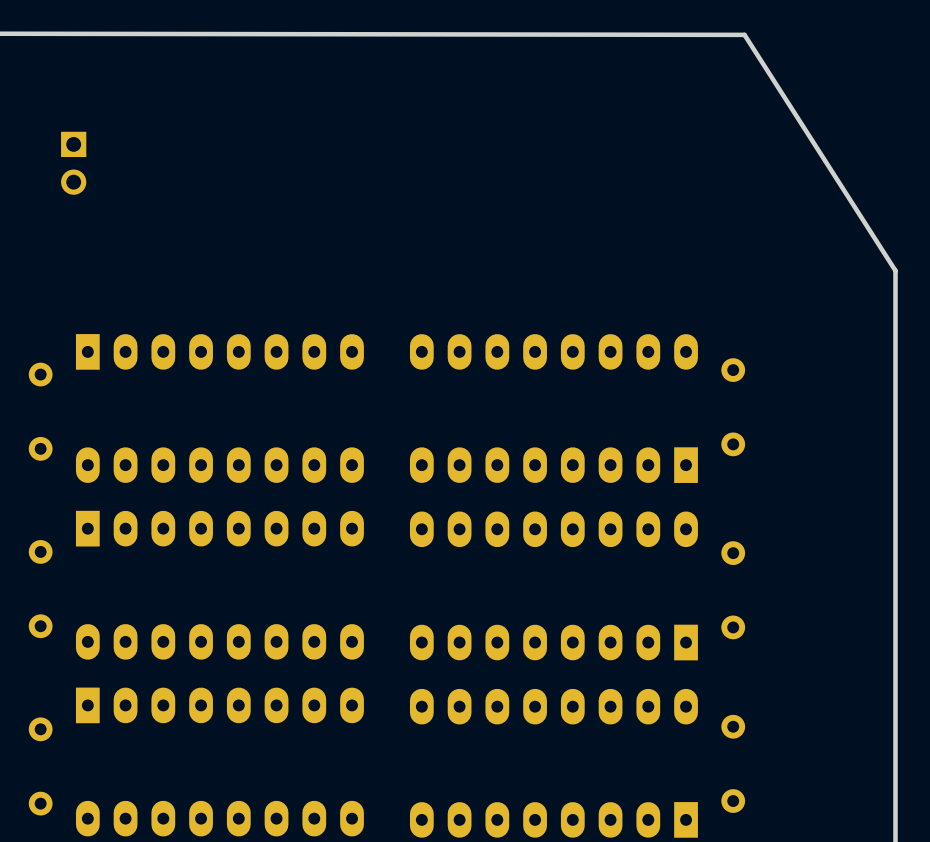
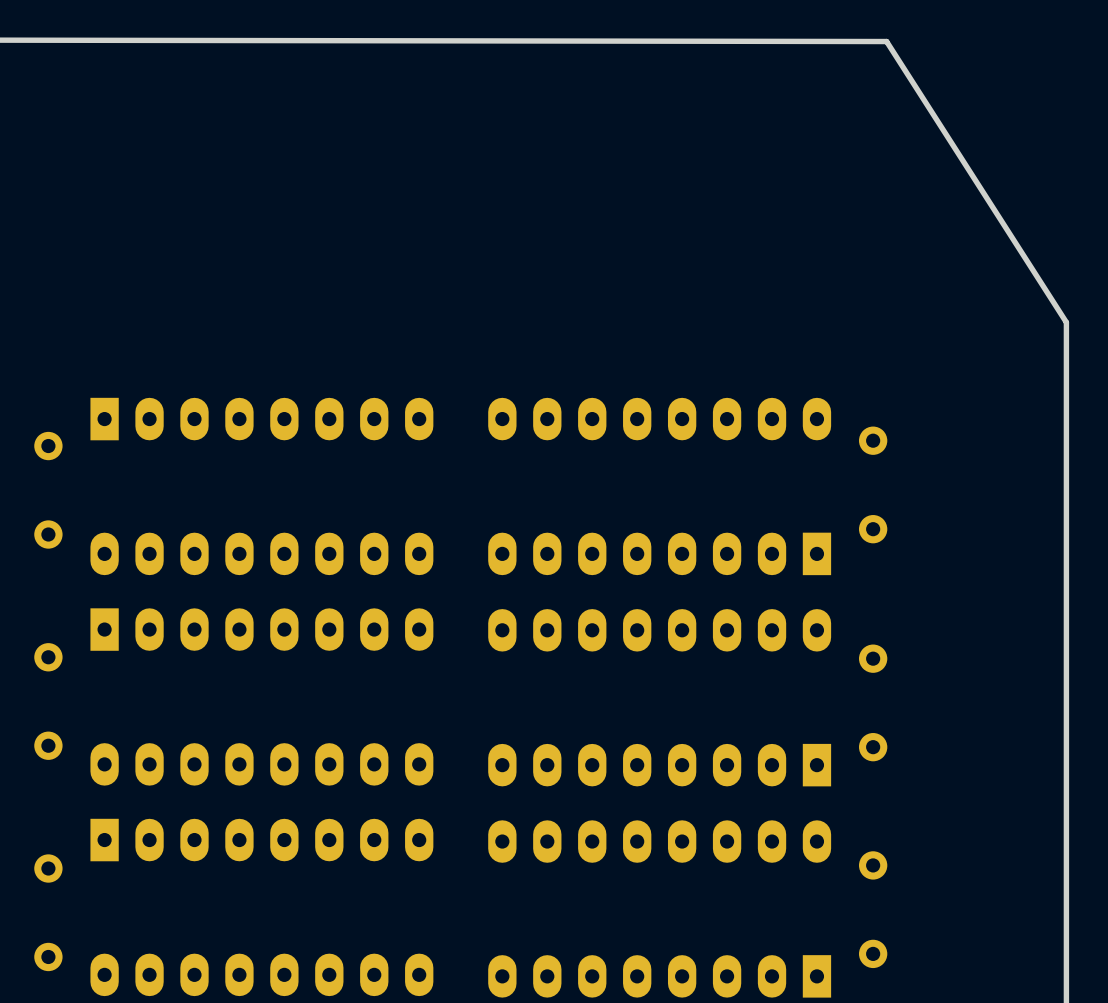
part: (73, 163) -> none

